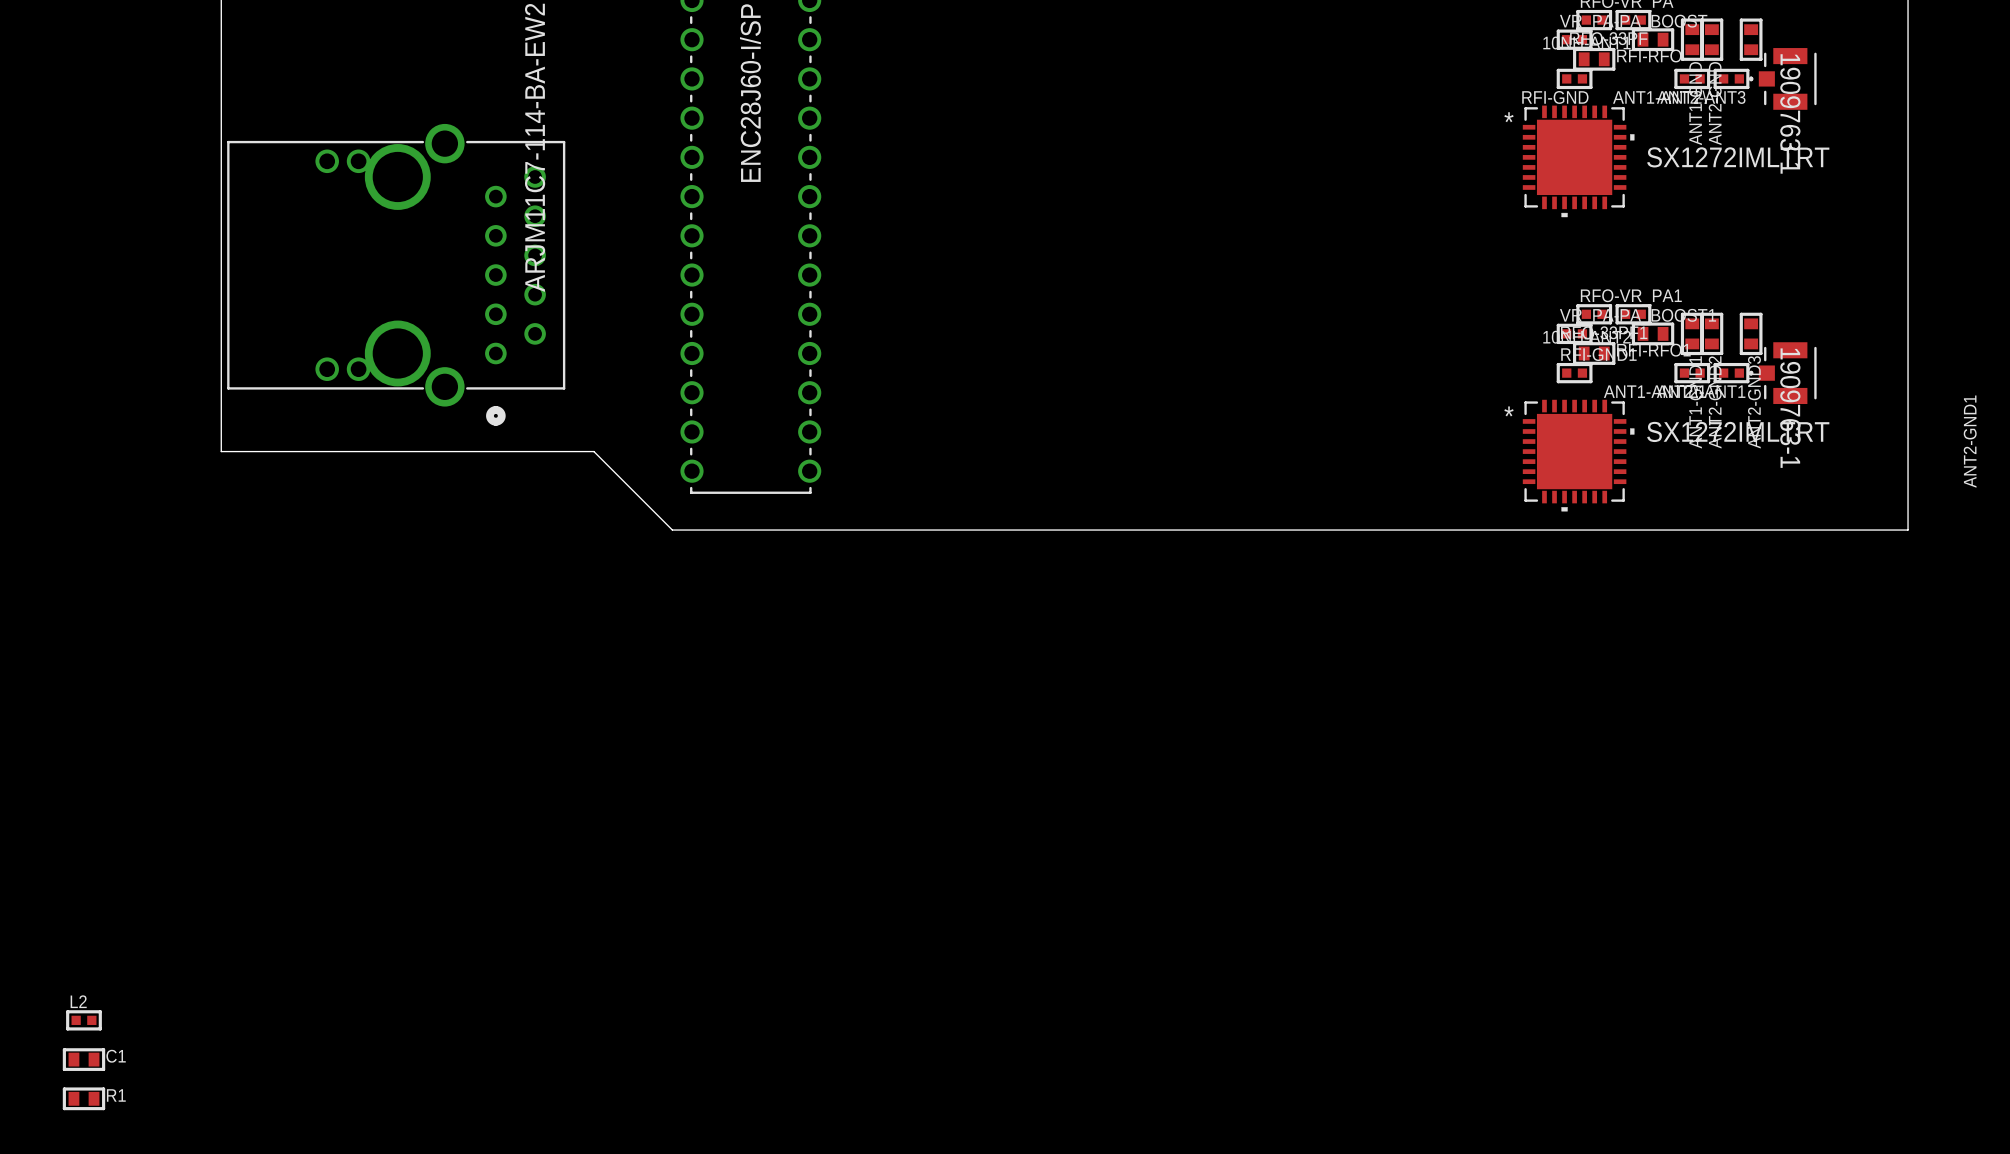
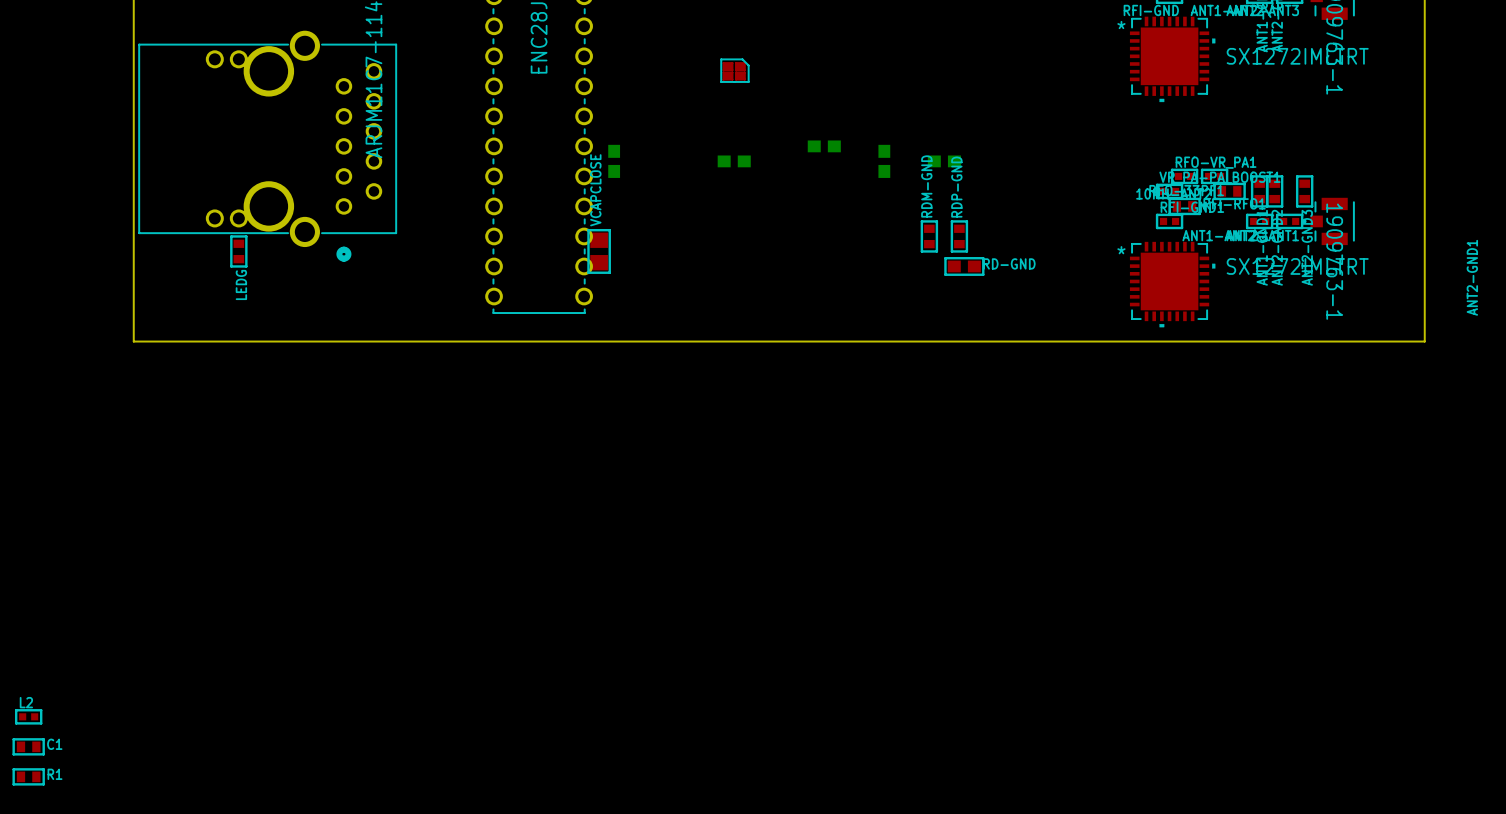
part: none -> (734, 70)
part: none -> (824, 146)
part: none -> (614, 161)
part: none -> (734, 161)
part: none -> (884, 161)
part: none -> (944, 161)
RDM-GND: none -> (929, 236)
RDP-GND: none -> (959, 236)
LEDG: none -> (238, 251)
VCAPCLOSE: none -> (599, 251)
RD-GND: none -> (964, 266)
board edge: (221, 451) (593, 451) (672, 530) -> (133, 281) (133, 341) (479, 341)

